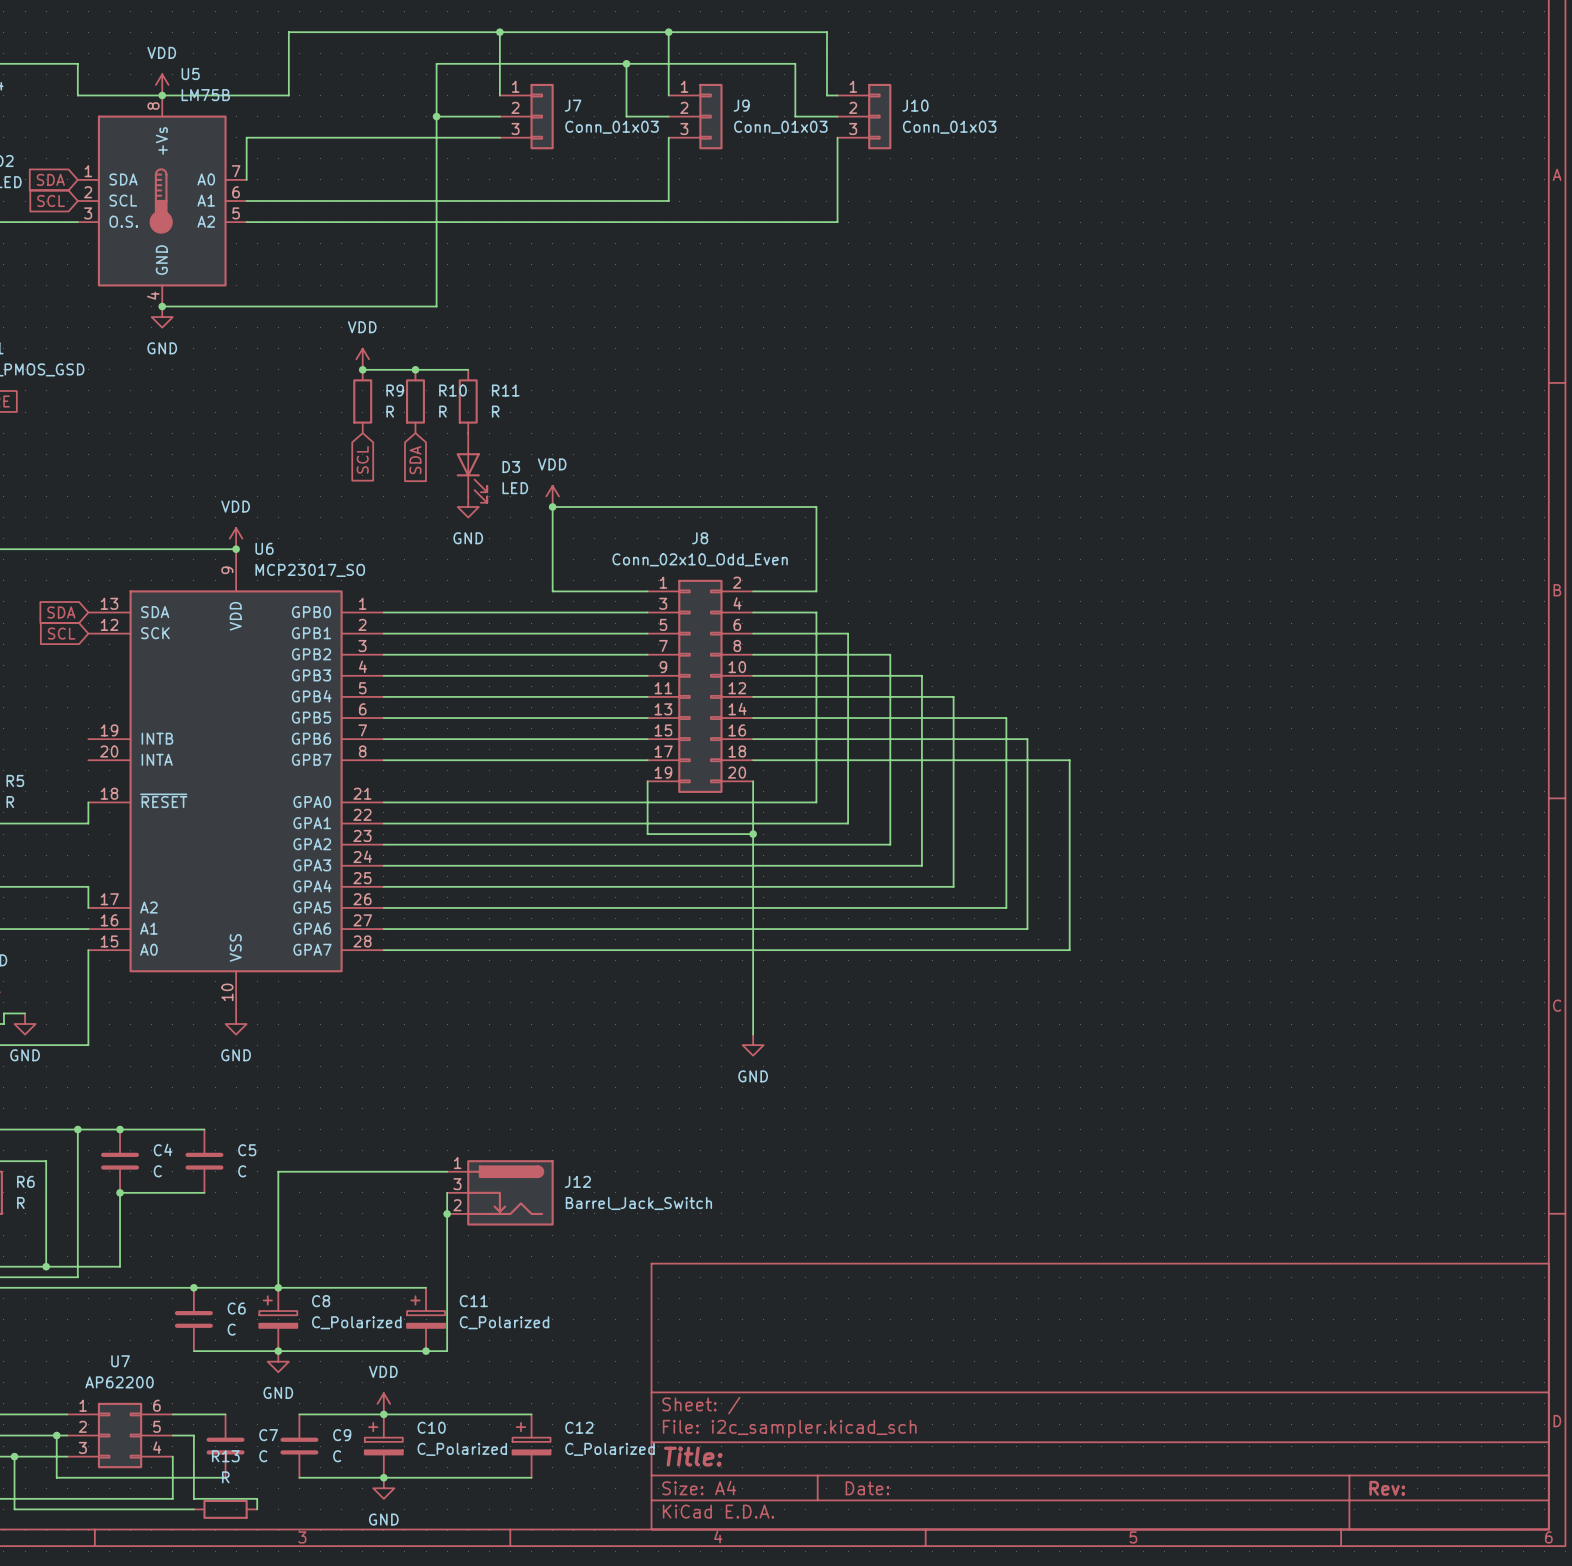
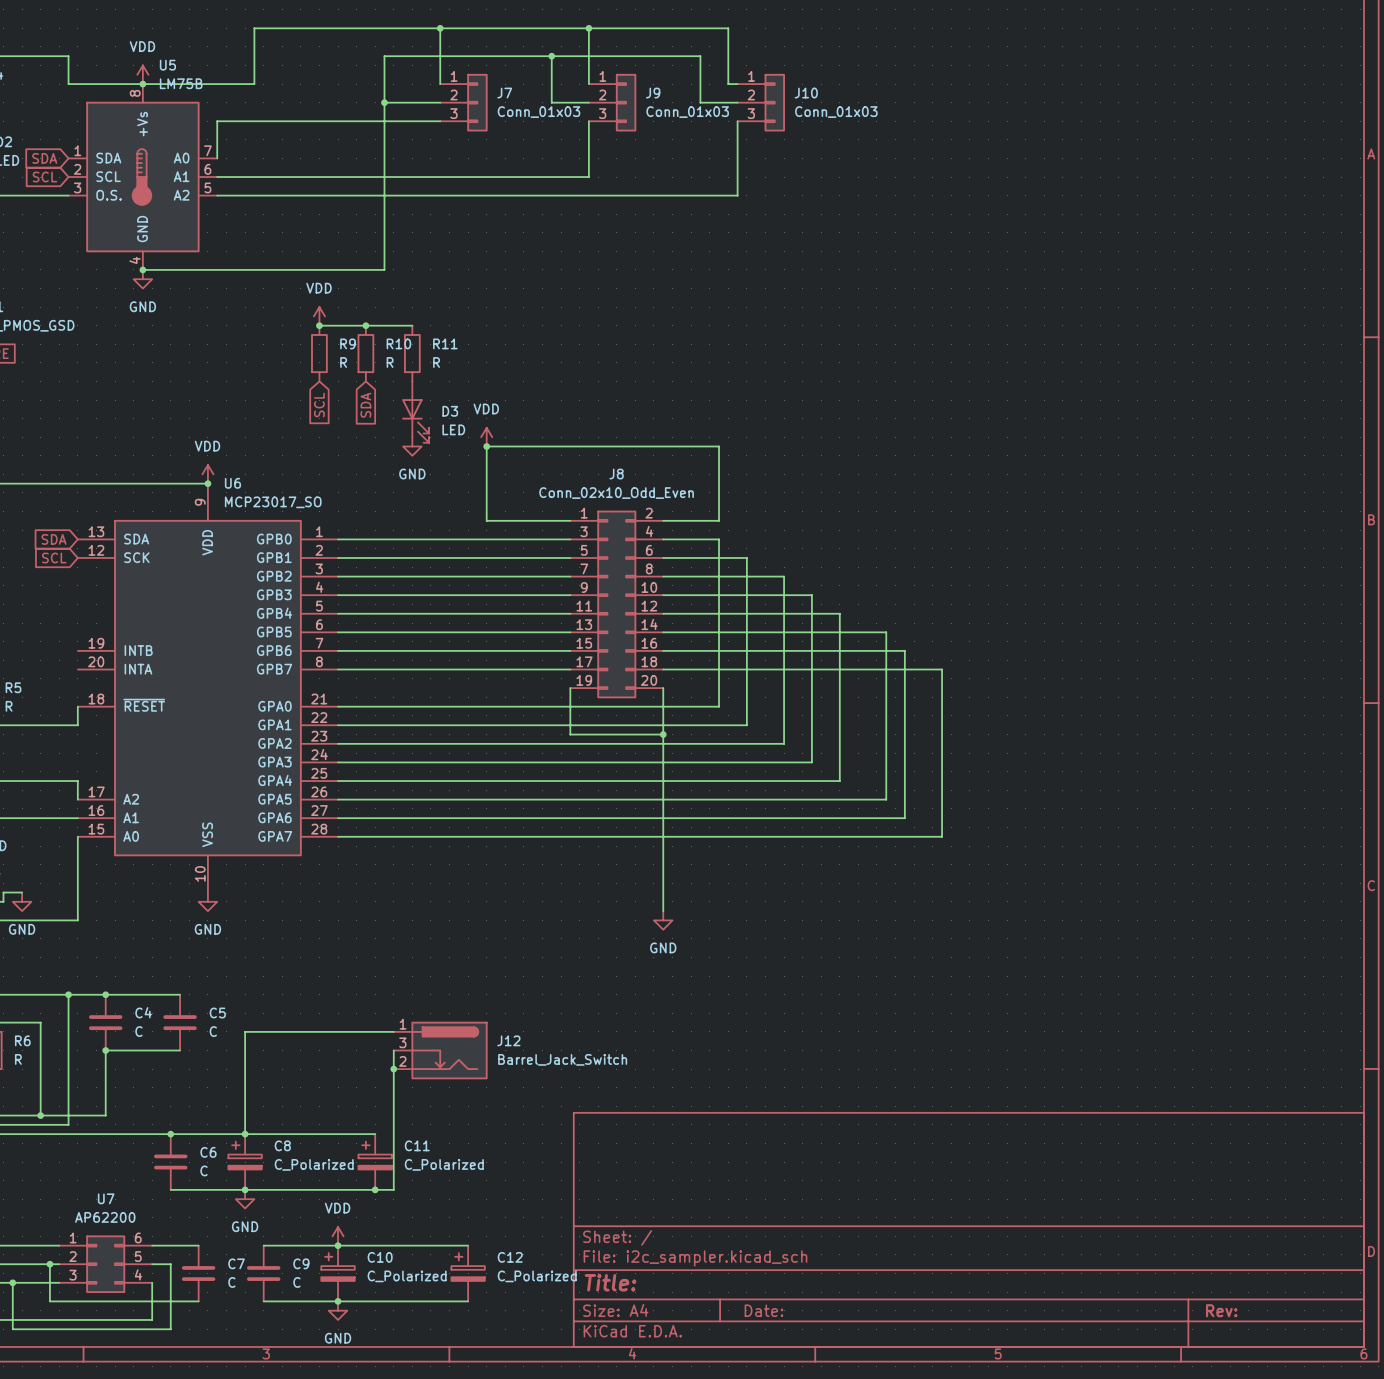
wire: (193, 1498) (257, 1498) (257, 1509) -> (170, 1319) (170, 1329)
R13: R (225, 1509) -> none

